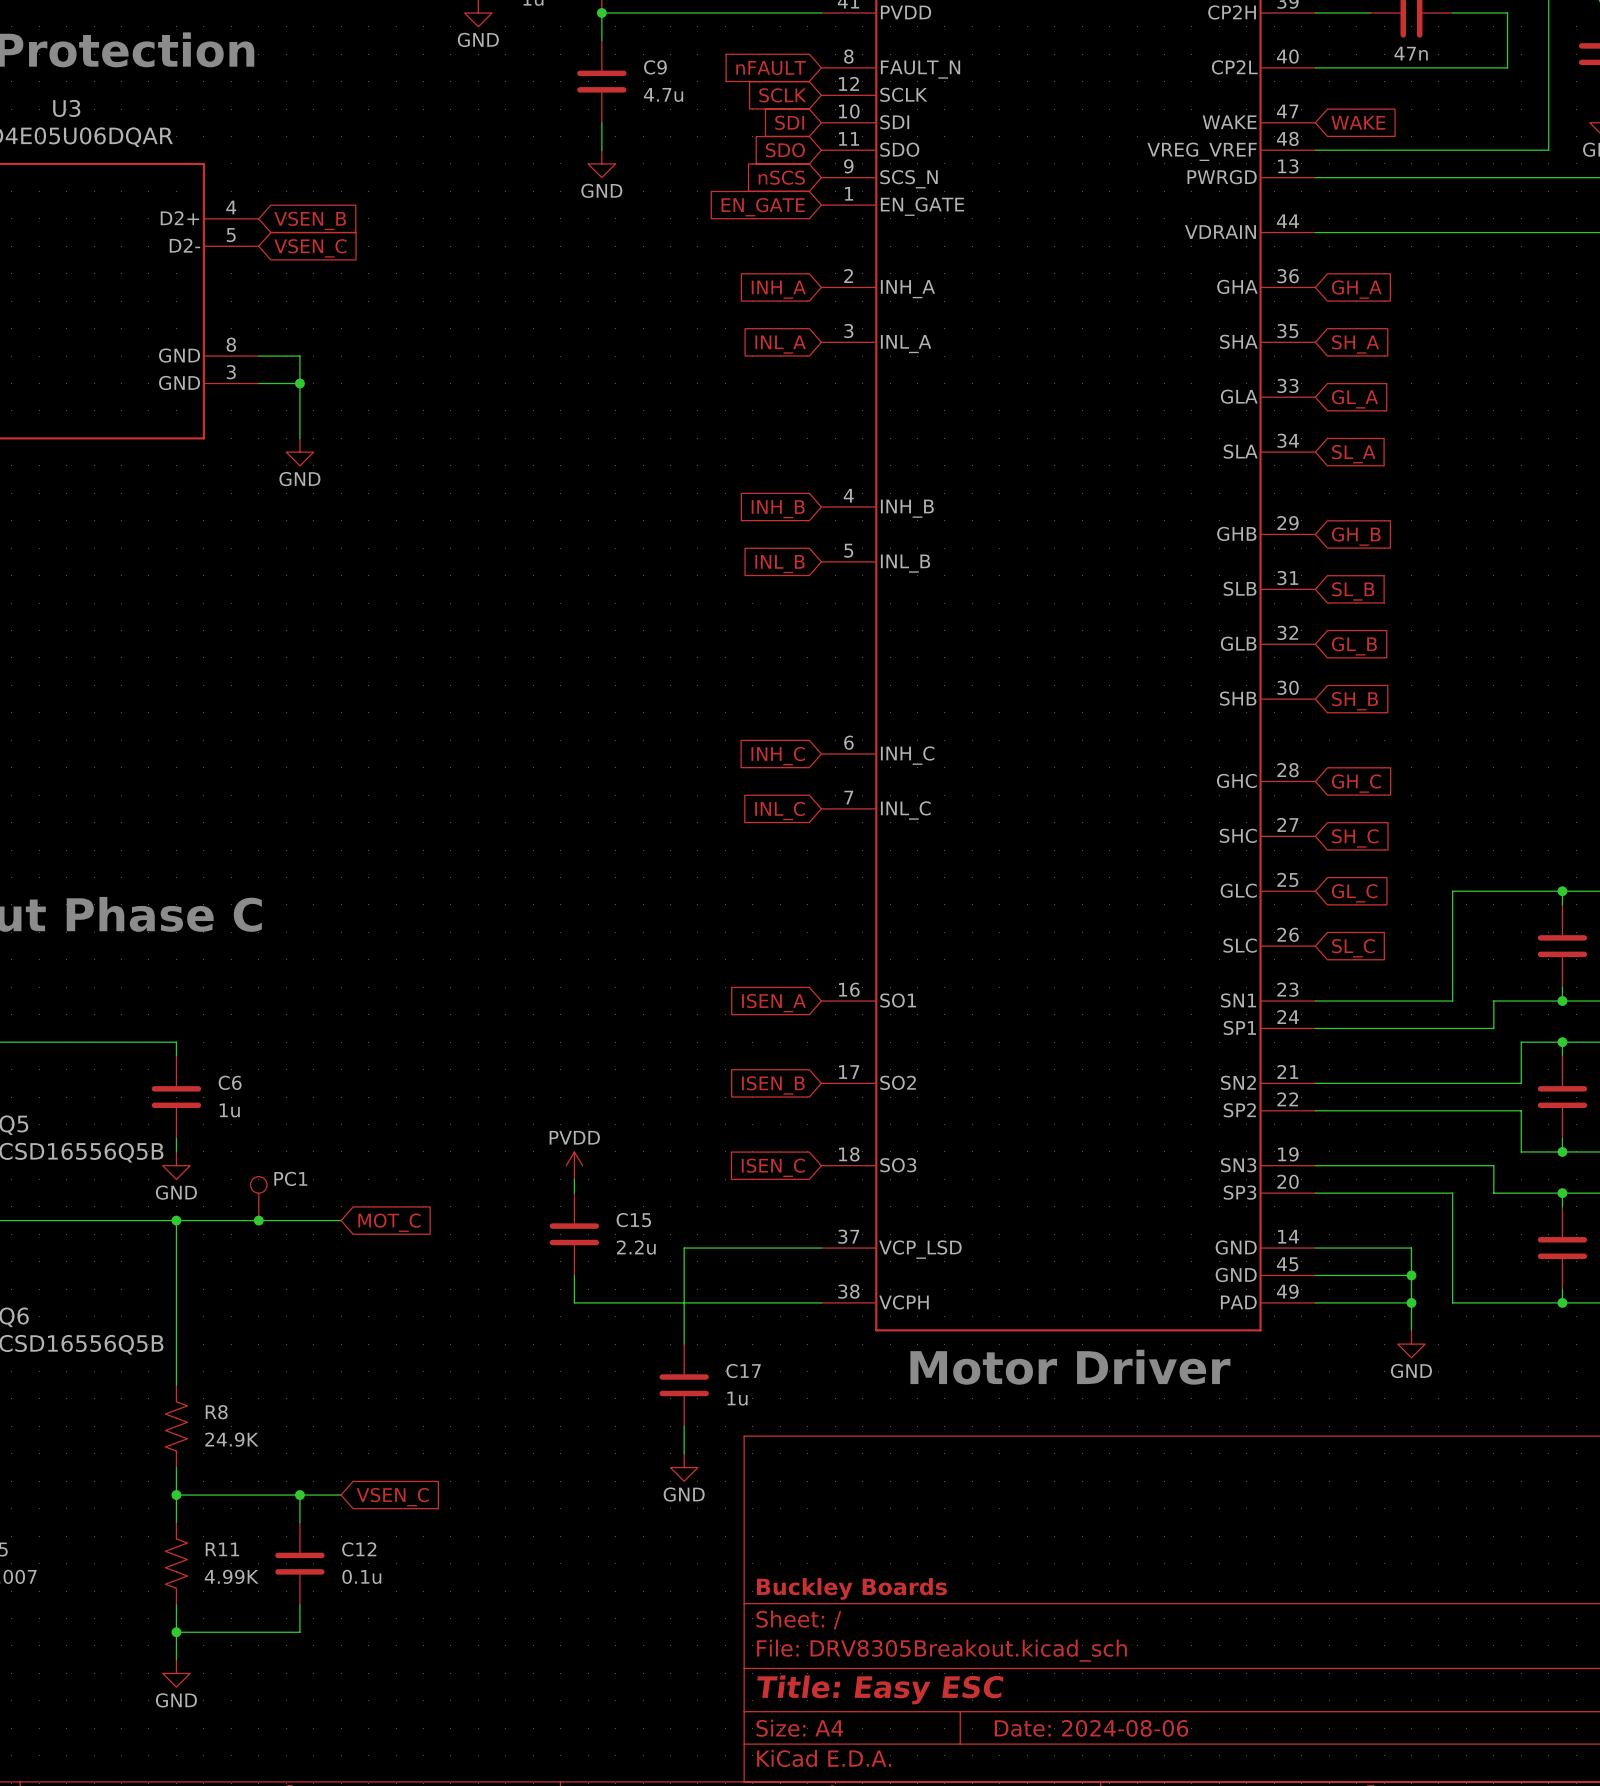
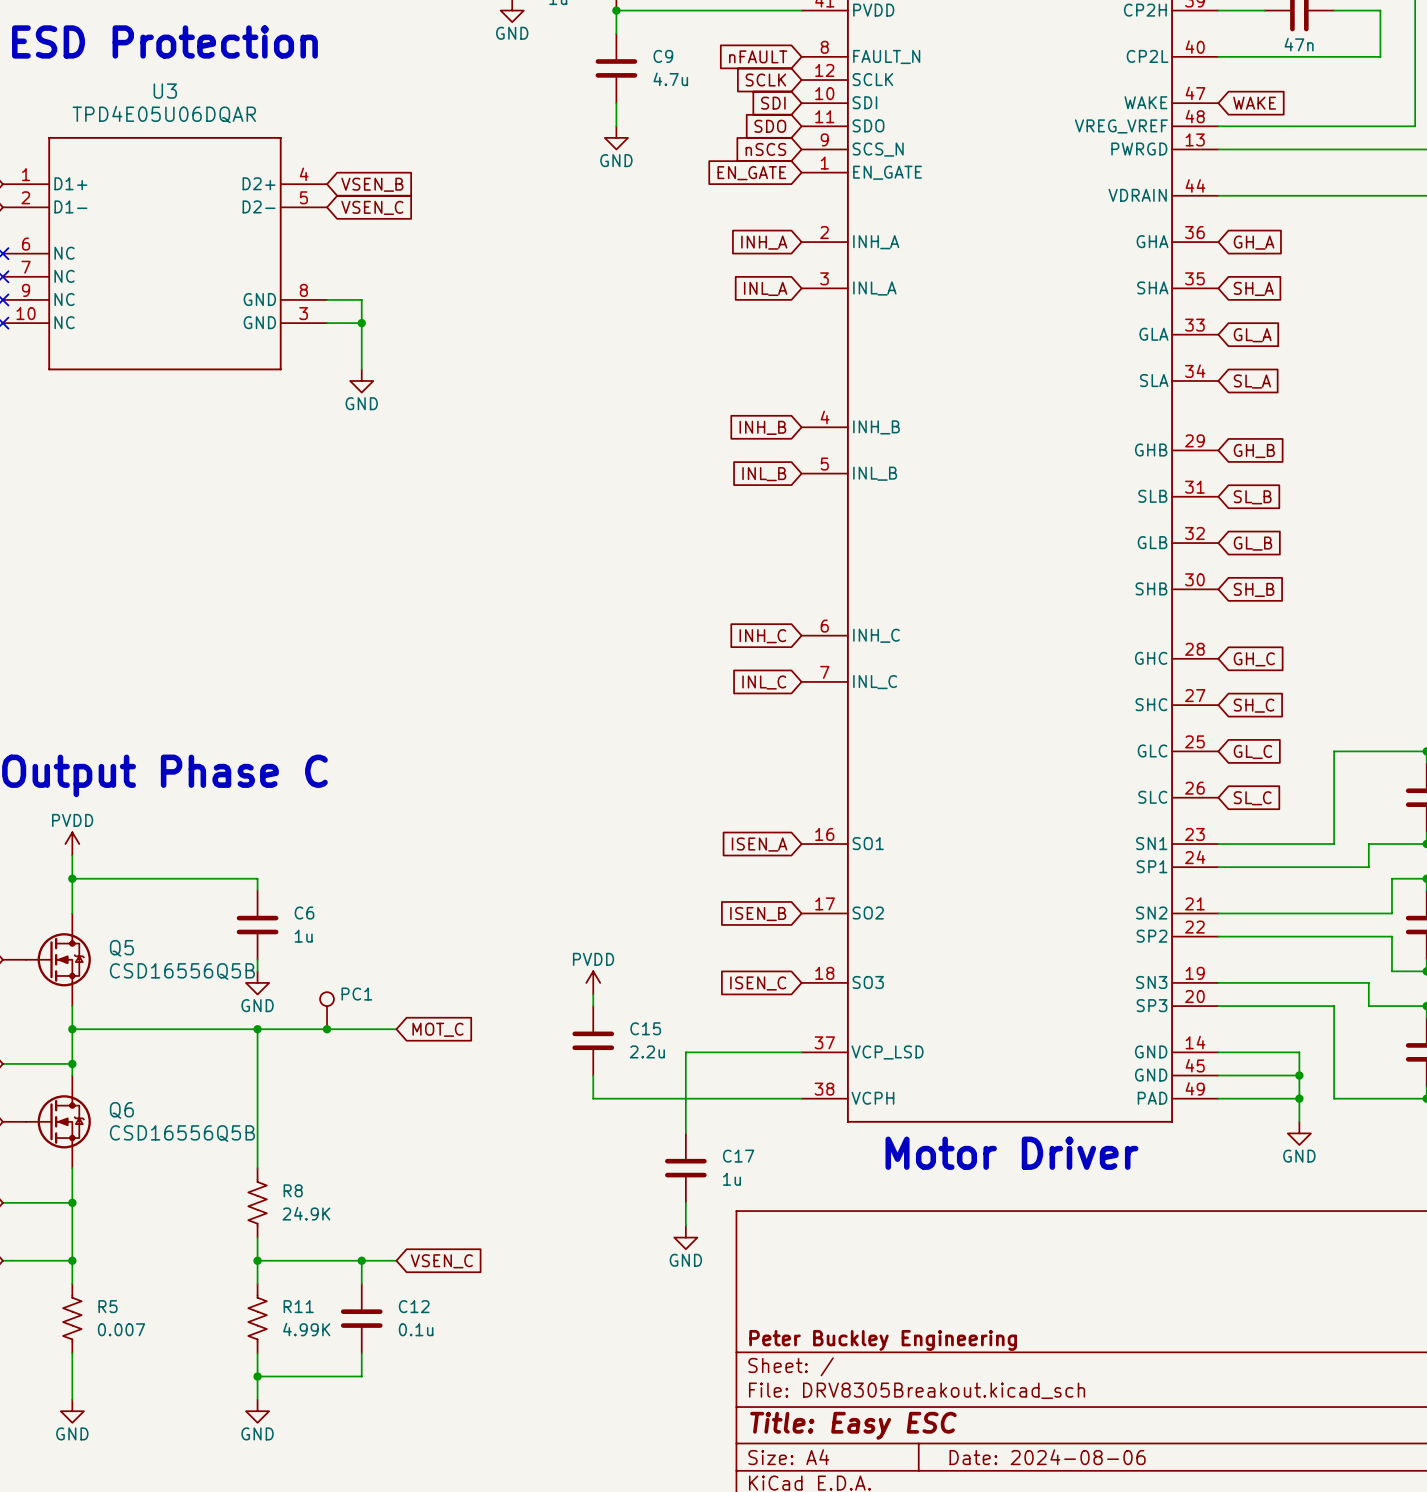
title block: Buckley Boards (851, 1588) -> Peter Buckley Engineering (883, 1340)

